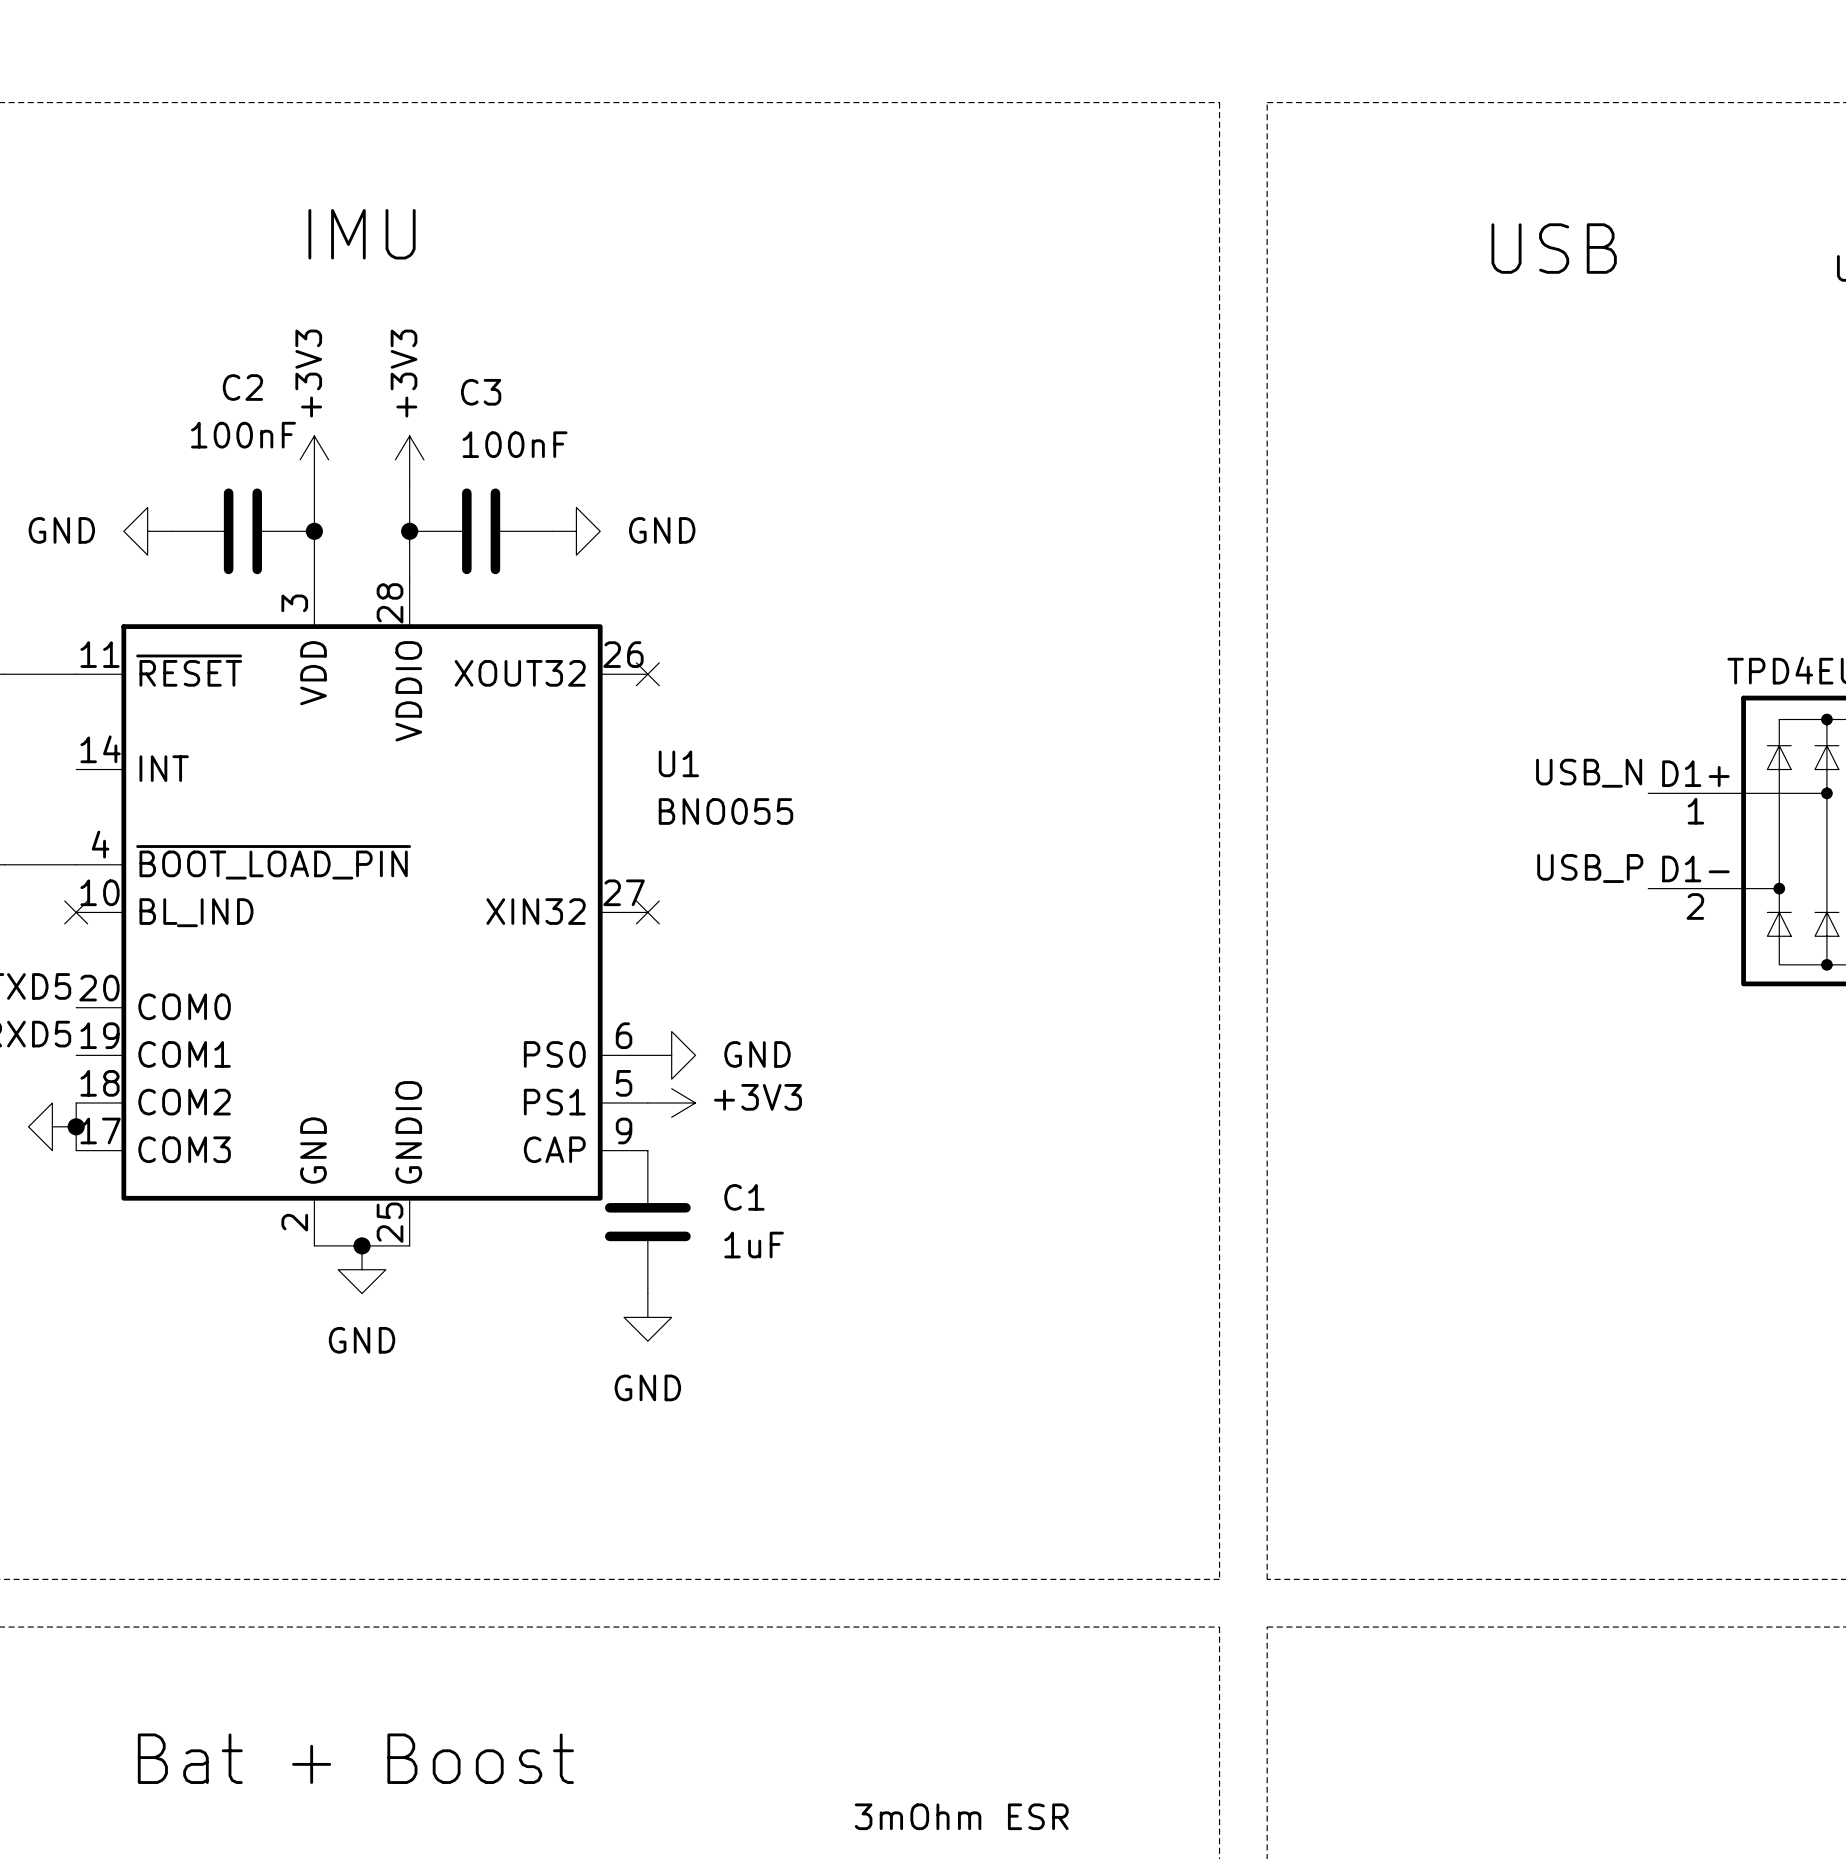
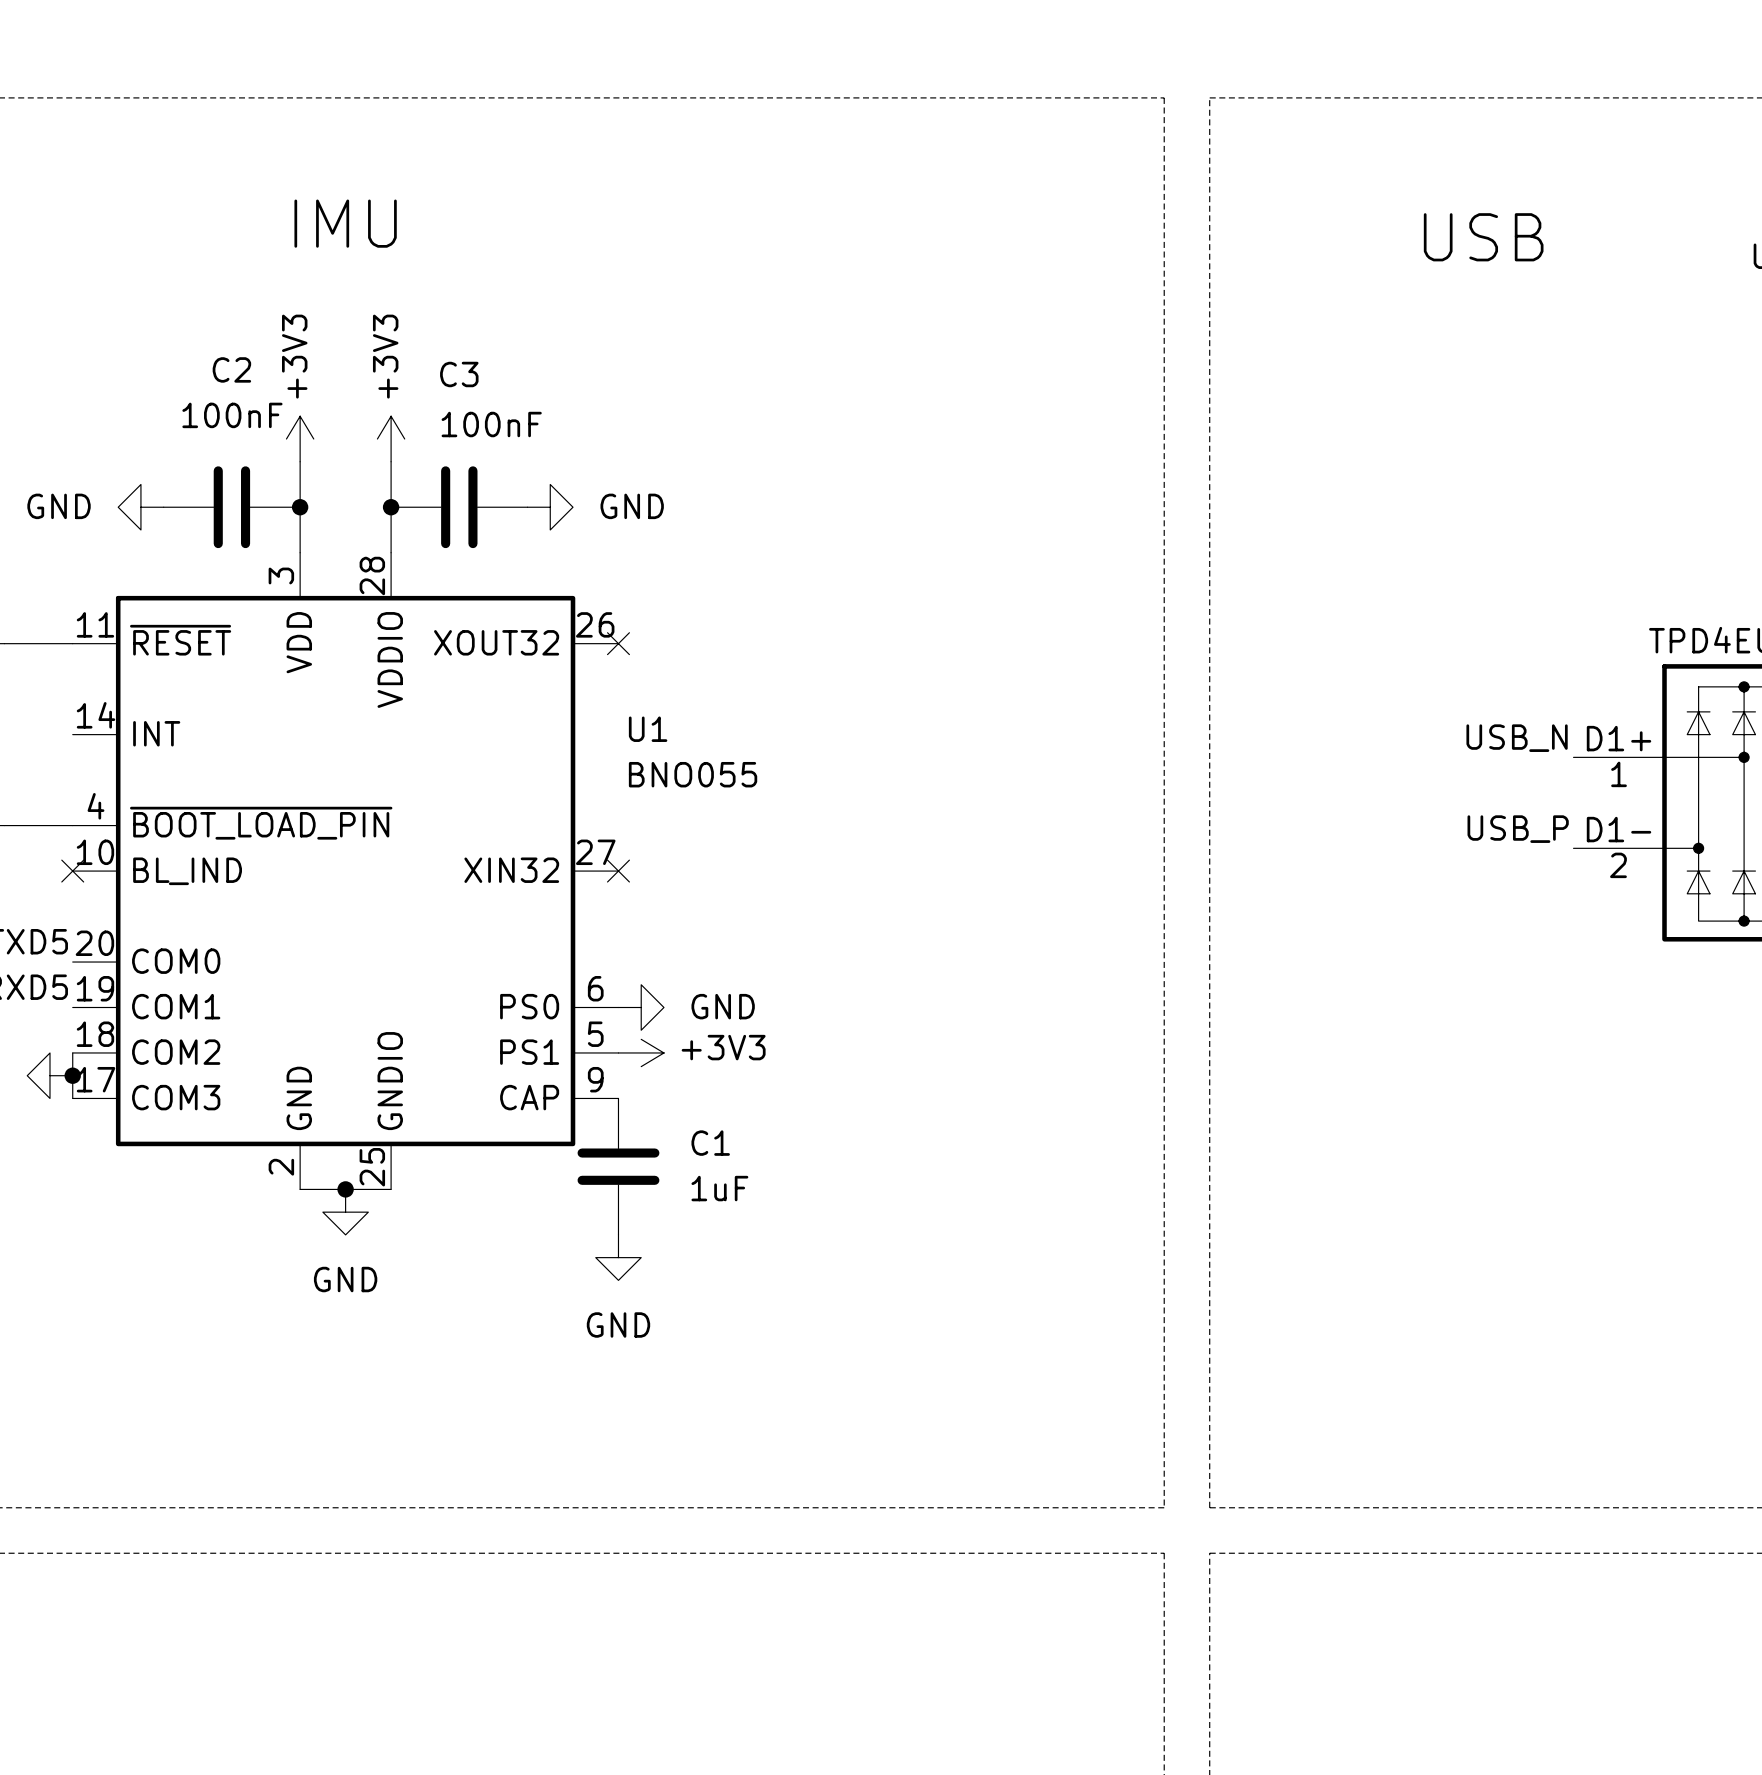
text: Bat + Boost (355, 1758) -> none
text: 3mOhm ESR (961, 1816) -> none

